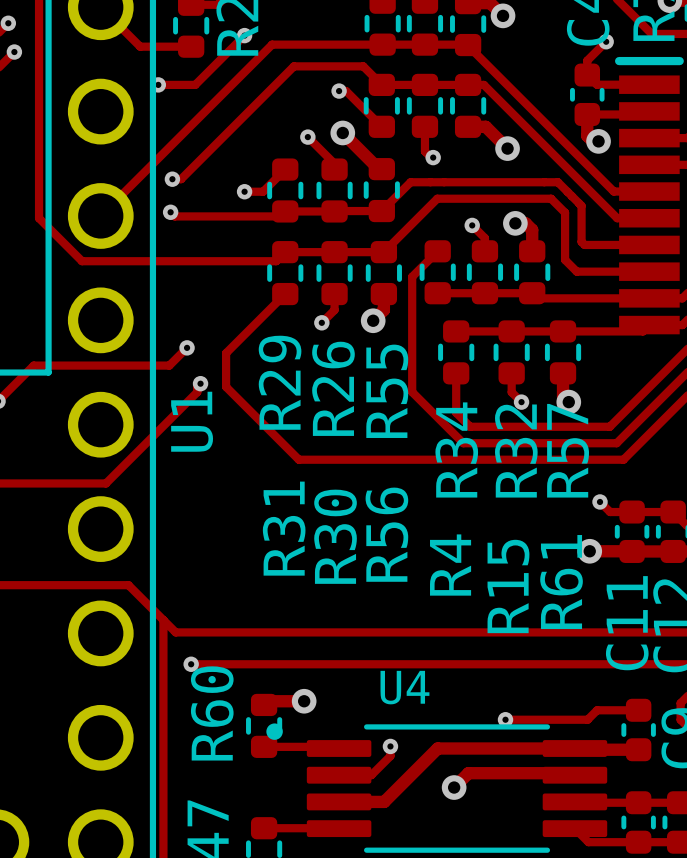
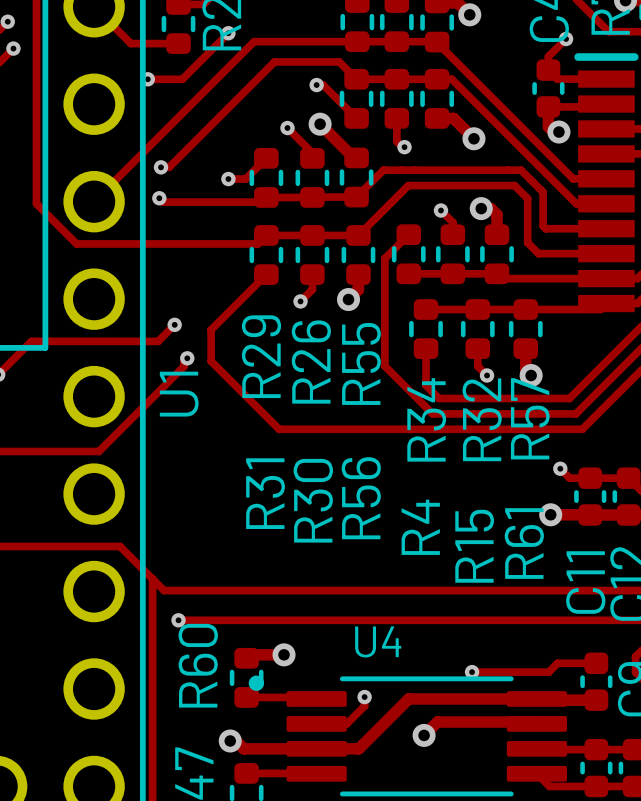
track: none -> (230, 740) (235, 740) (243, 748) (316, 748)
via: none -> (230, 740)

